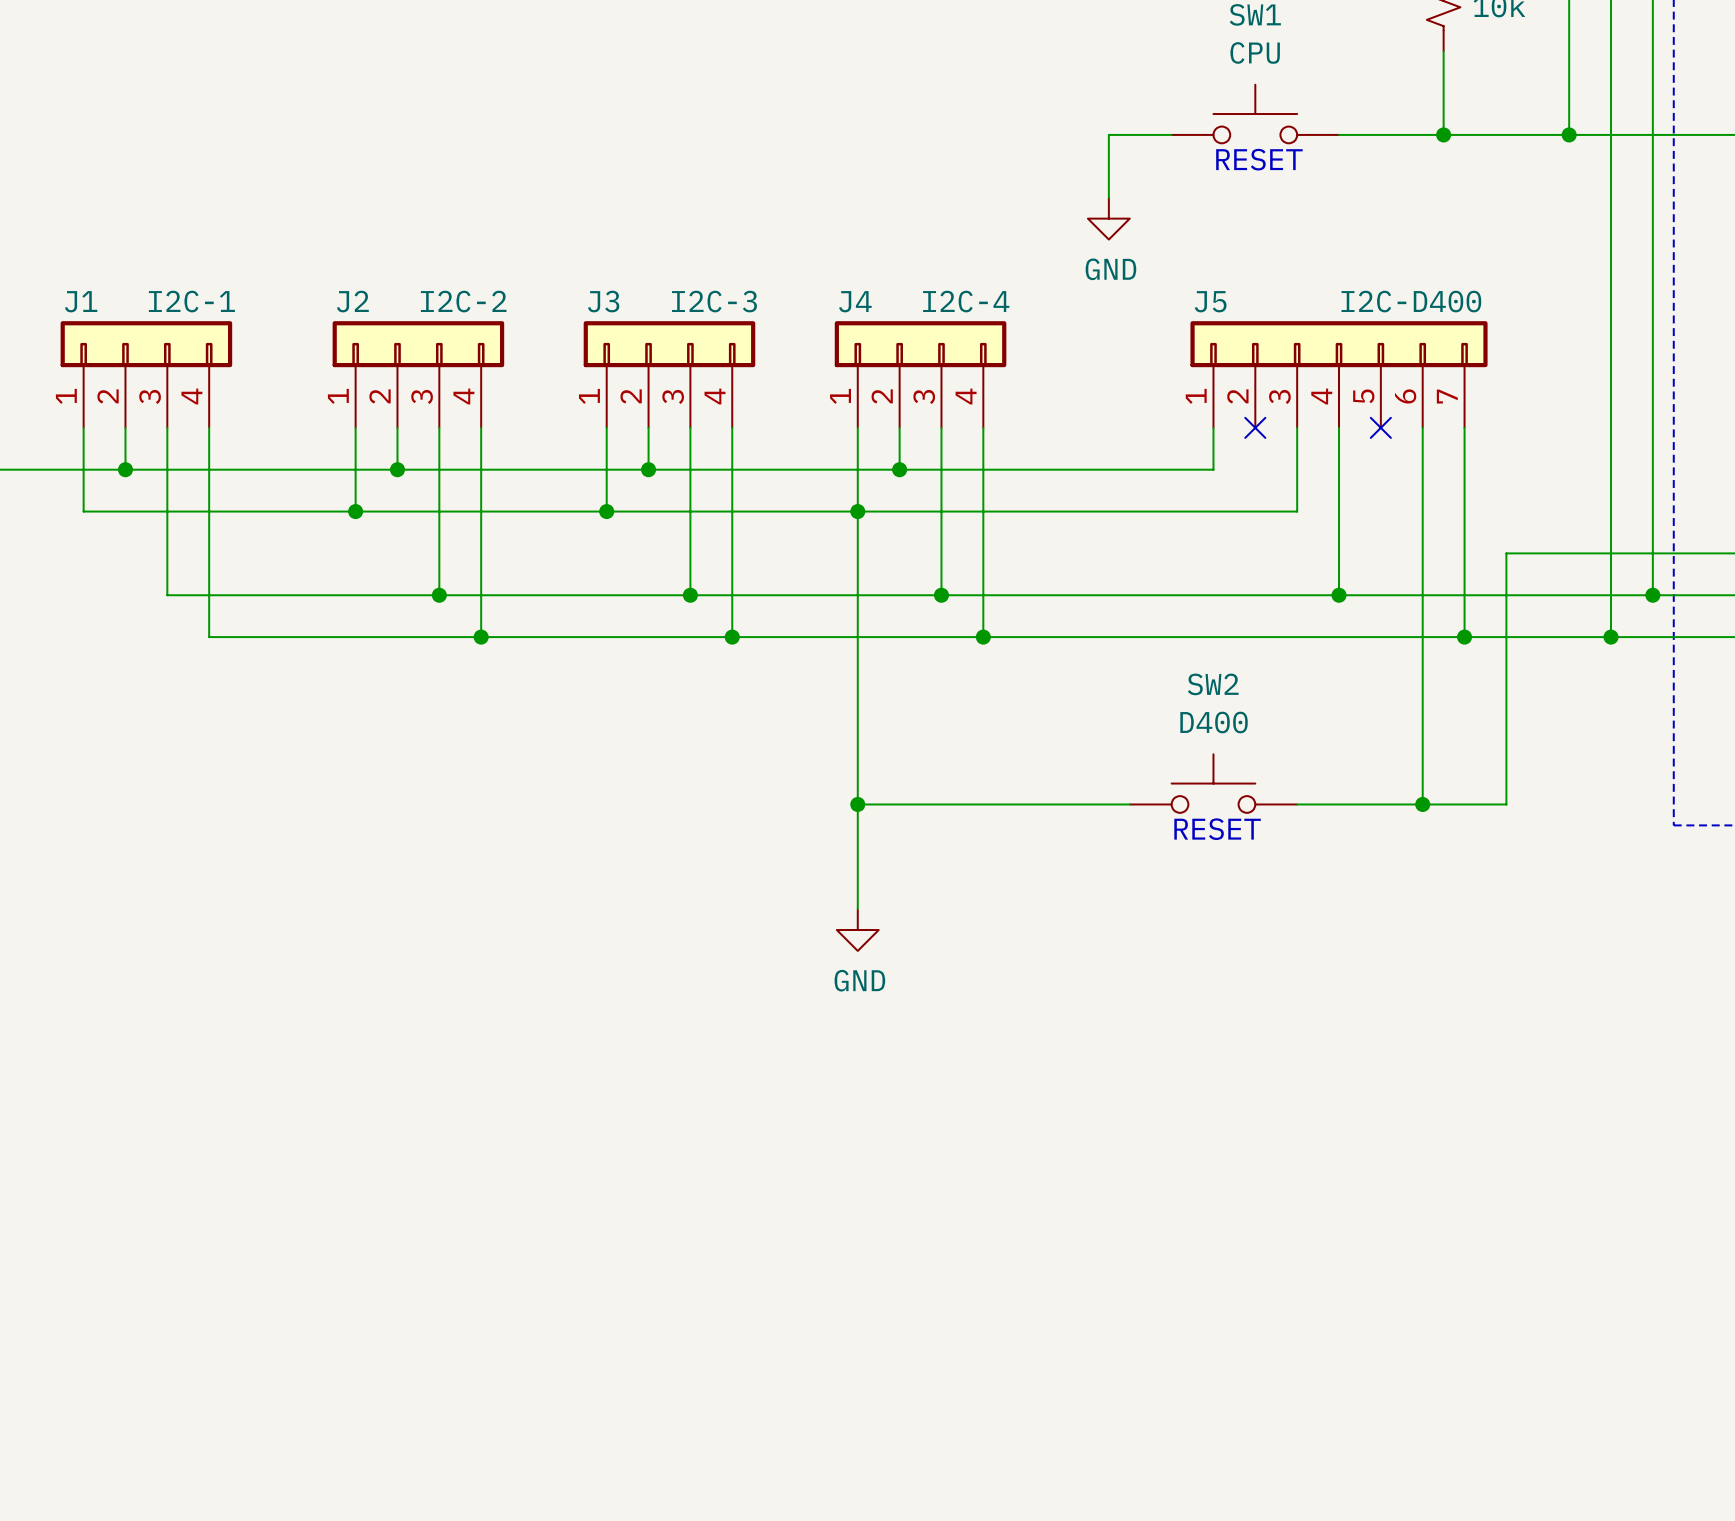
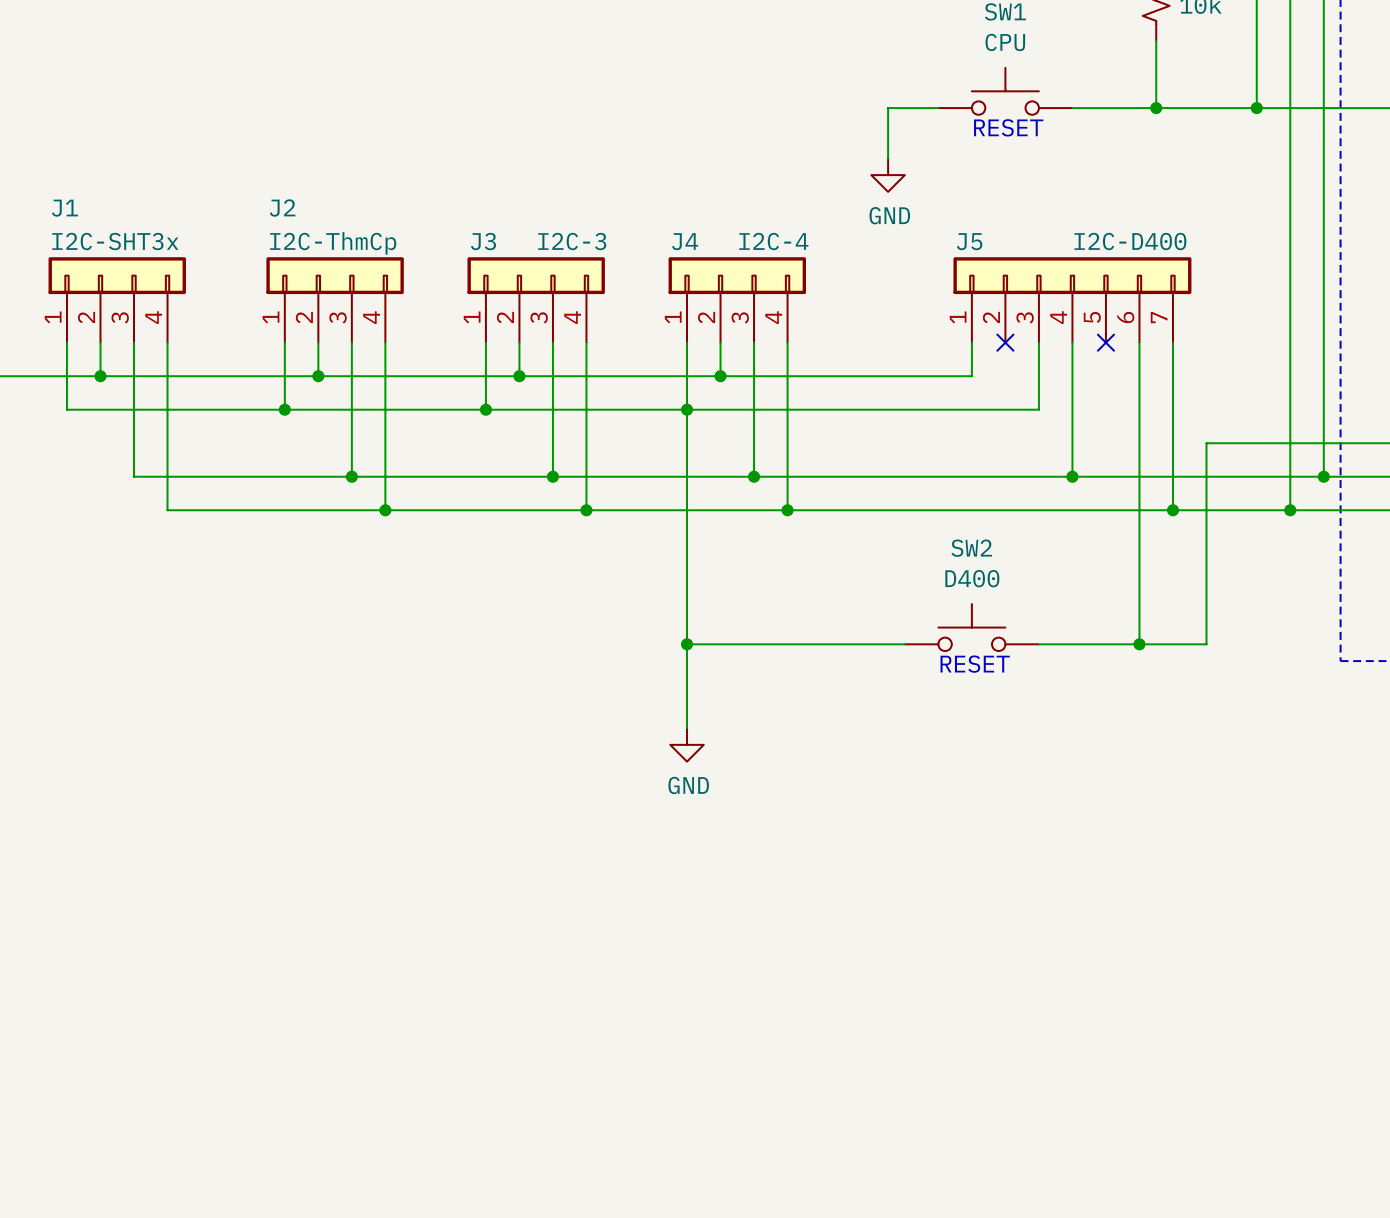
J1 name position: J1 (81, 301) -> J1 (64, 208)
J1 value: I2C-1 (191, 301) -> I2C-SHT3x (115, 241)
J2 name position: J2 (352, 301) -> J2 (282, 207)
J2 value: I2C-2 (463, 301) -> I2C-ThmCp (333, 243)

